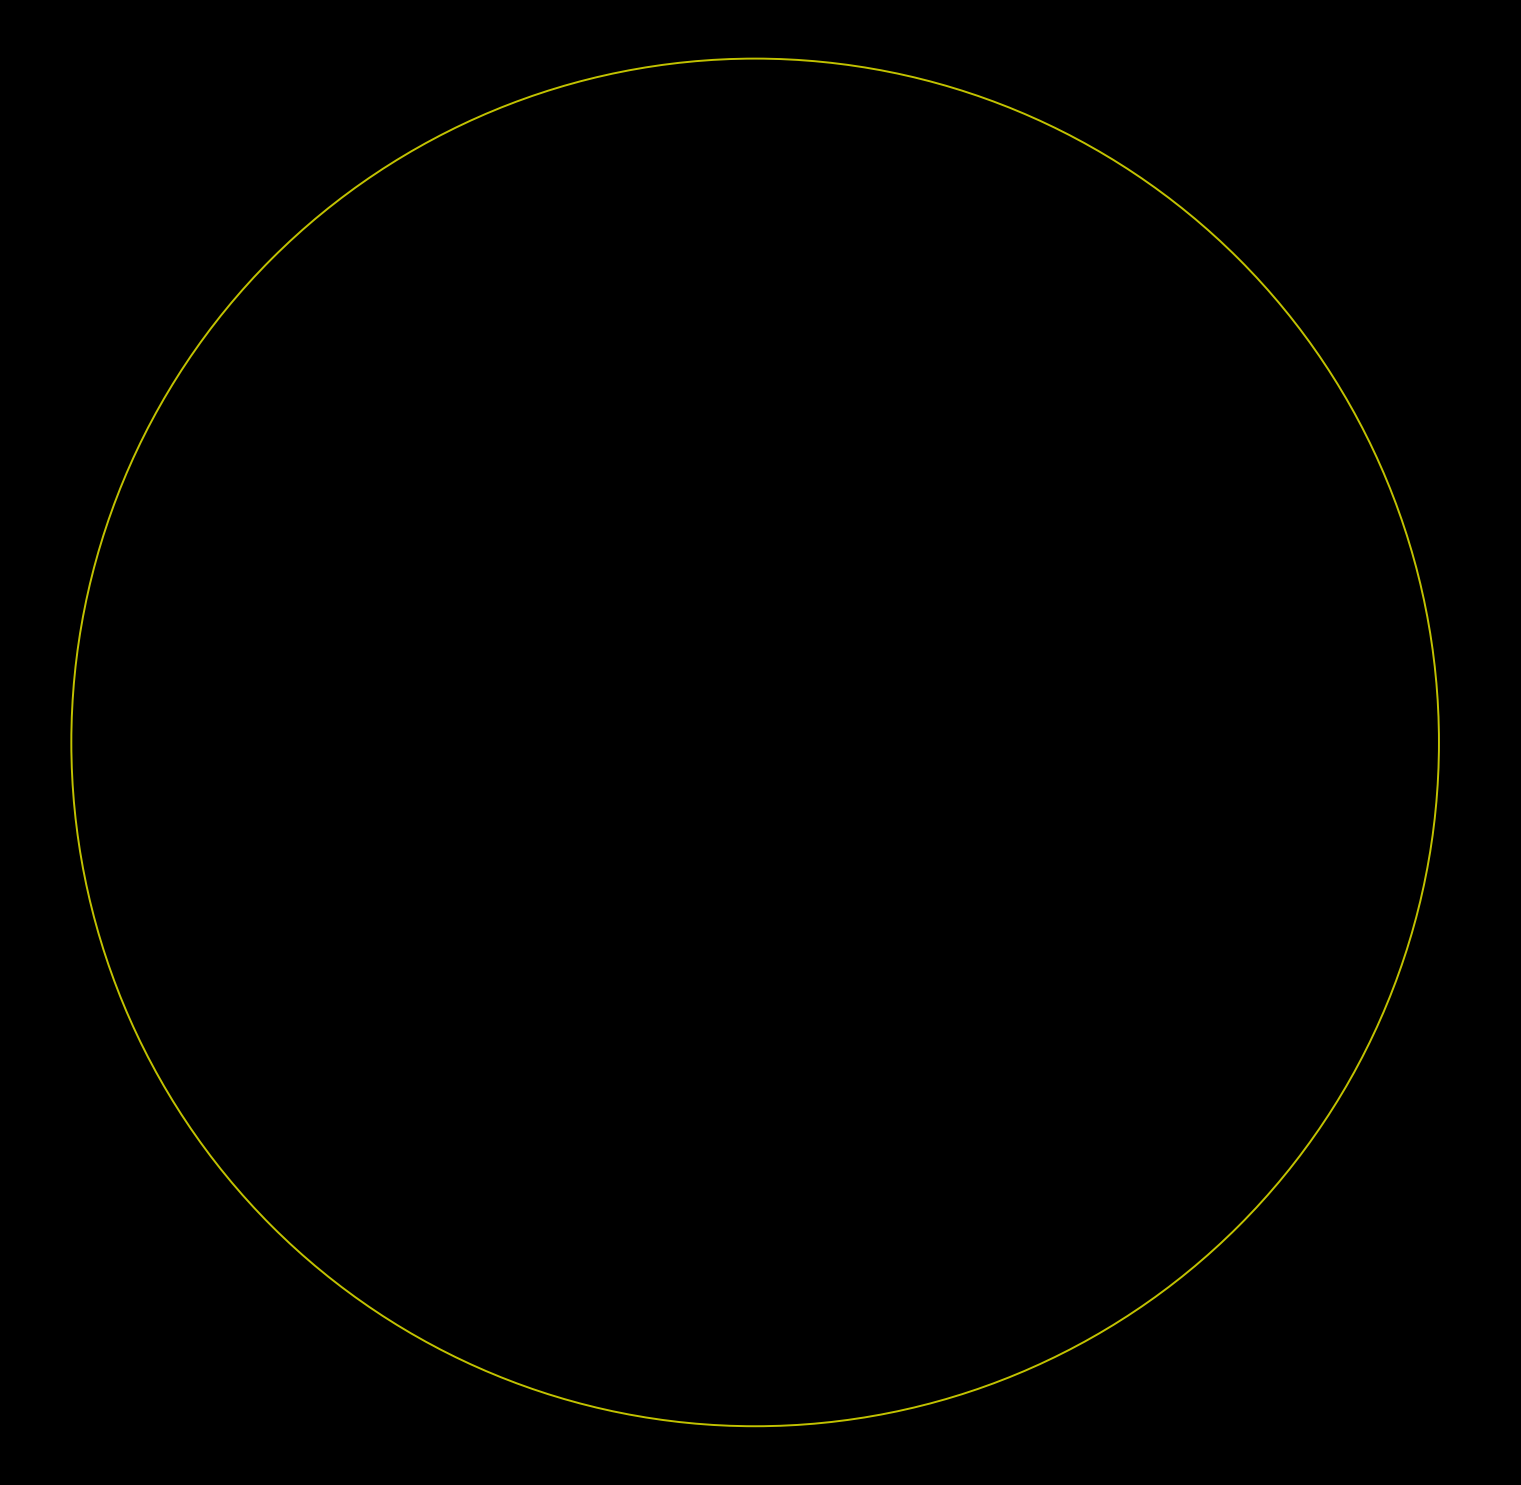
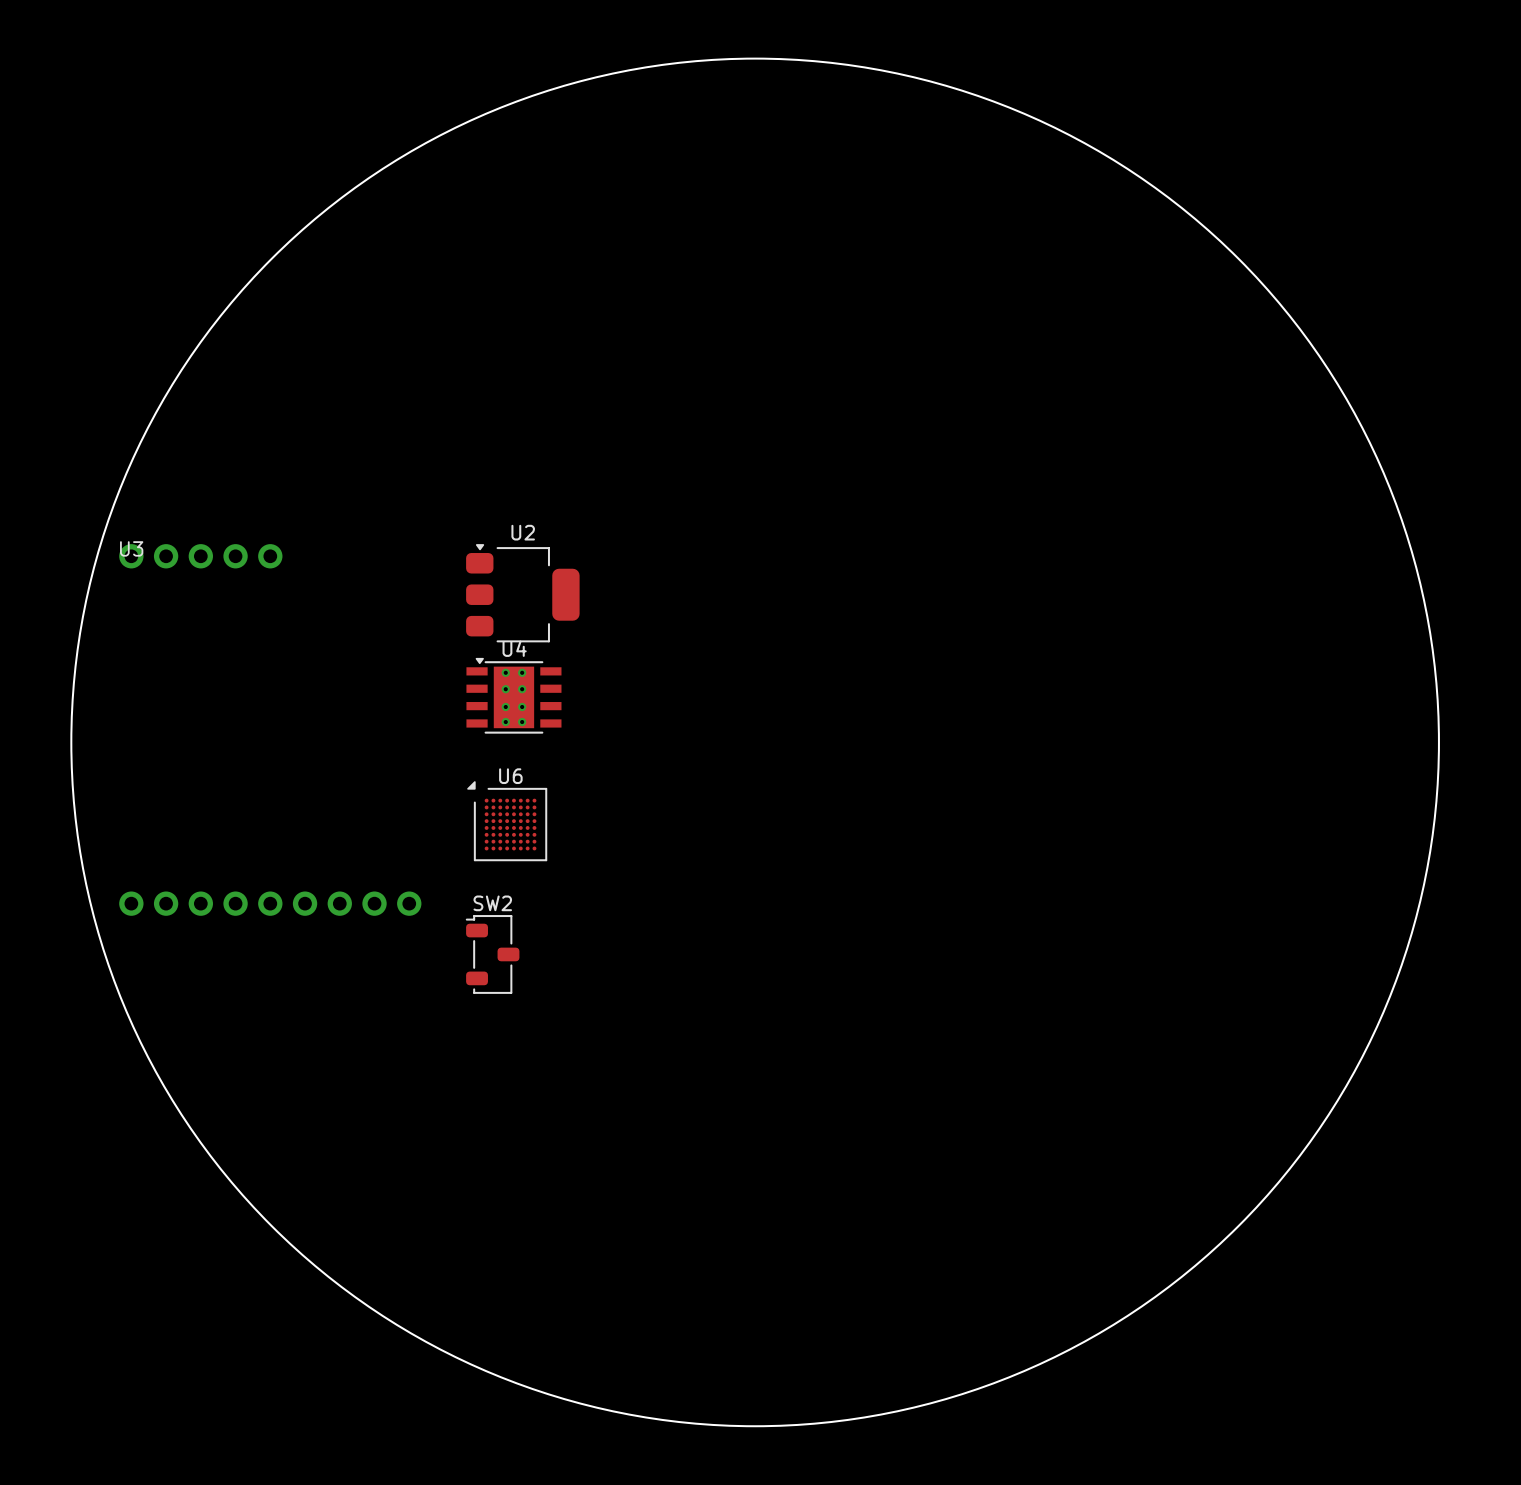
U2: none -> (522, 593)
U4: none -> (513, 695)
U3: none -> (270, 729)
U6: none -> (507, 821)
SW2: none -> (492, 954)

